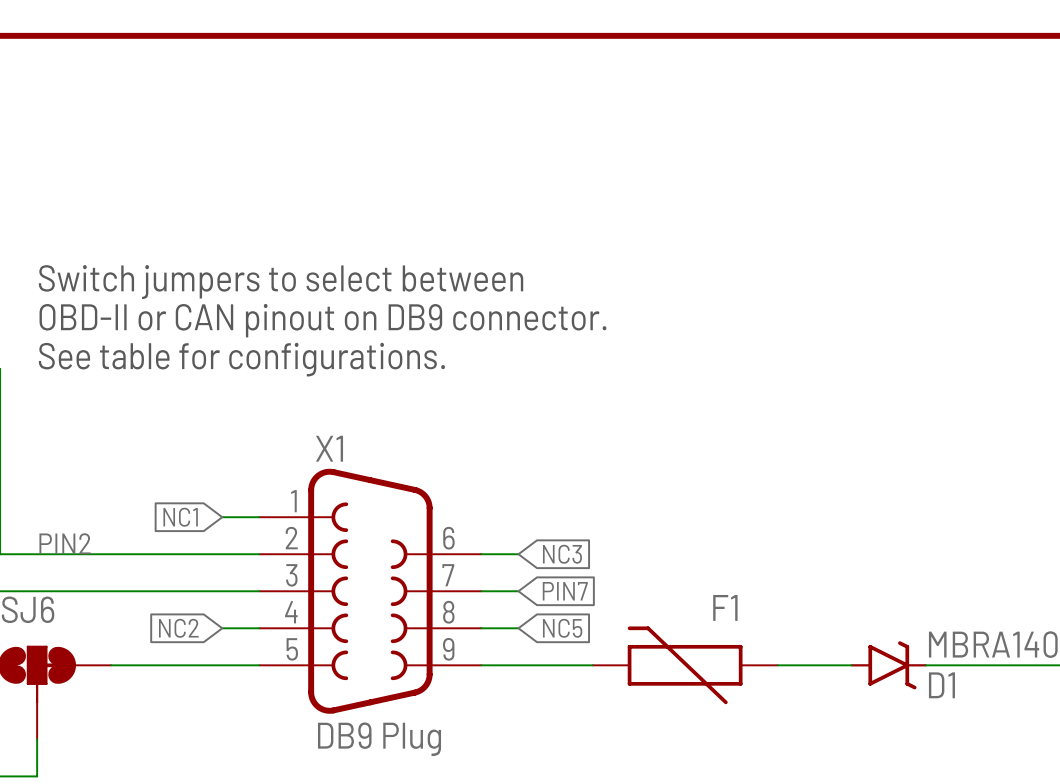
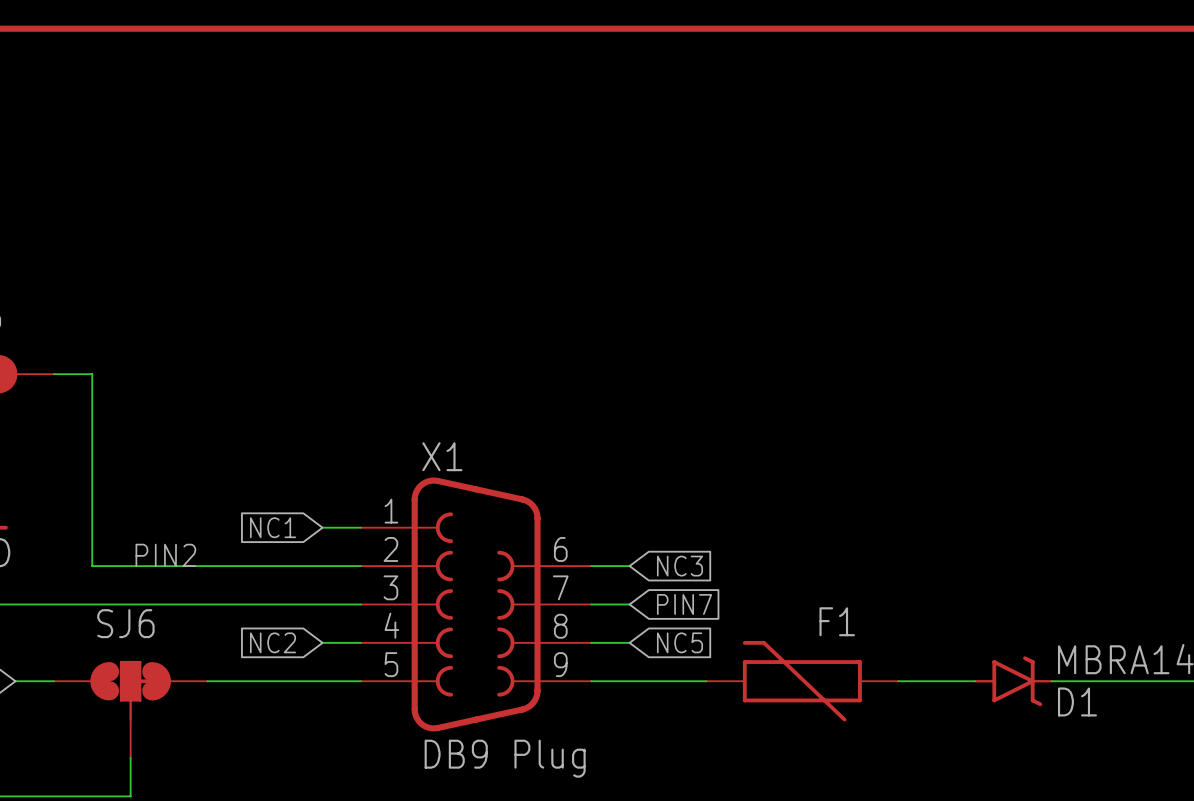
text: Switch jumpers to select between (281, 282) -> none
text: OBD-II or CAN pinout on DB9 connector. (322, 320) -> none
text: See table for configurations. (241, 359) -> none

